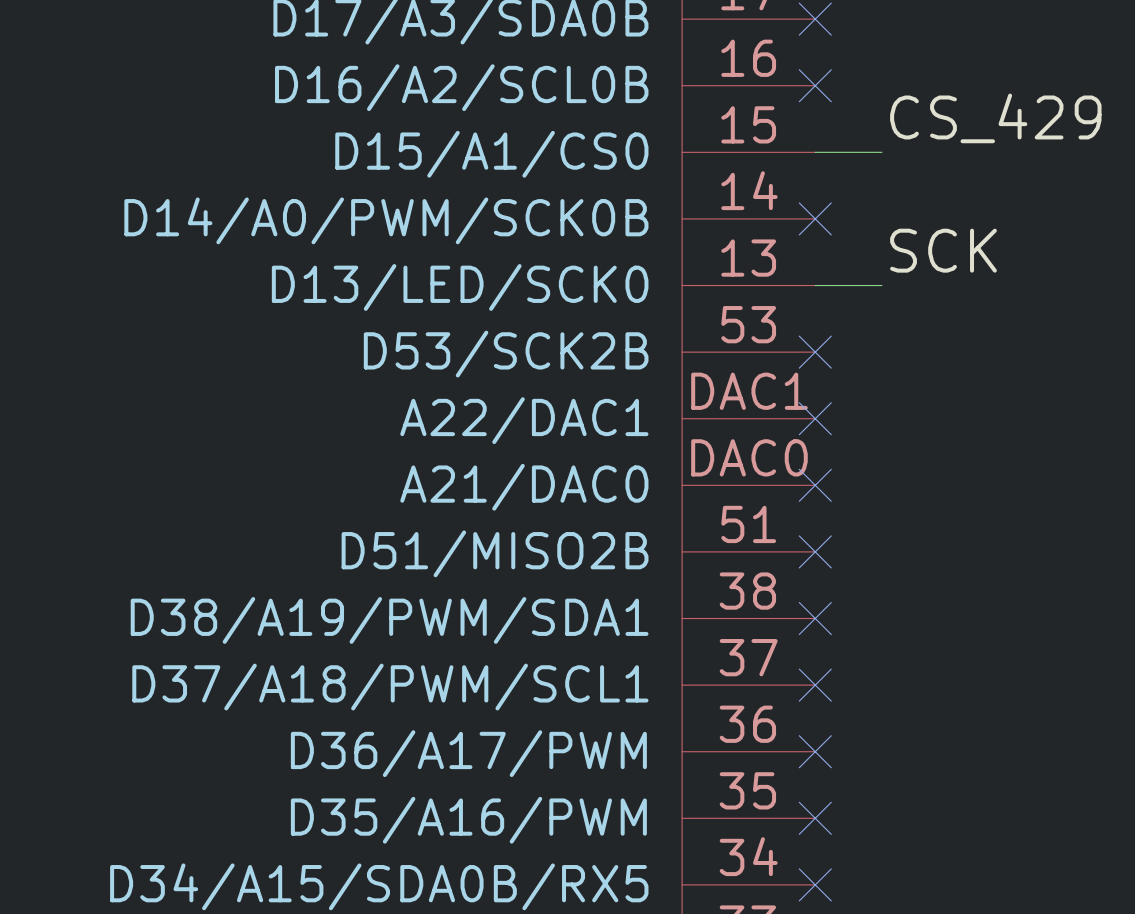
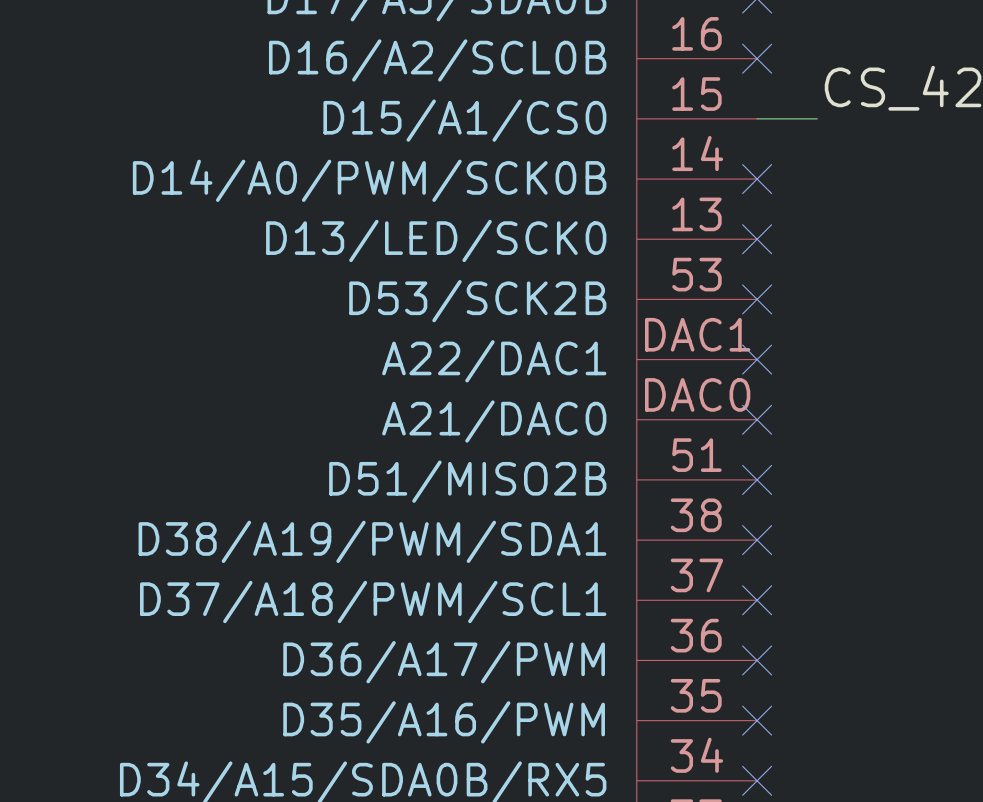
label: SCK (943, 250) -> none
wire: (815, 285) (881, 285) -> none
no-connect mark: none -> (757, 239)

